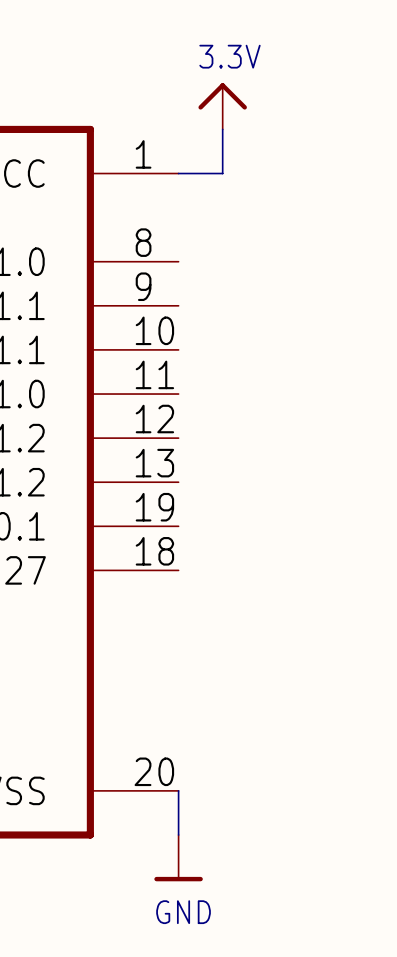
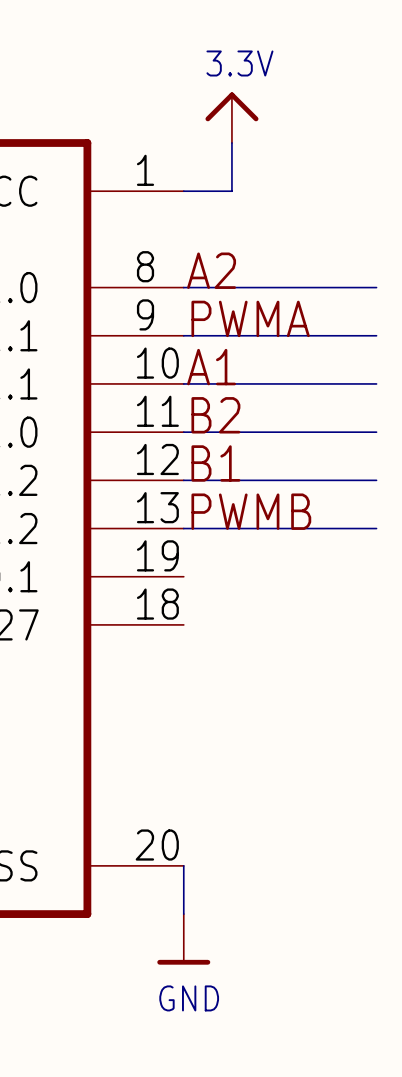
label: none -> A2 (211, 270)
wire: none -> (183, 287) (376, 287)
label: none -> PWMA (250, 318)
wire: none -> (183, 335) (376, 335)
label: none -> A1 (211, 367)
wire: none -> (183, 383) (376, 383)
label: none -> B2 (215, 415)
wire: none -> (183, 432) (376, 432)
label: none -> B1 (215, 463)
wire: none -> (183, 480) (376, 480)
label: none -> PWMB (251, 511)
wire: none -> (183, 528) (376, 528)

